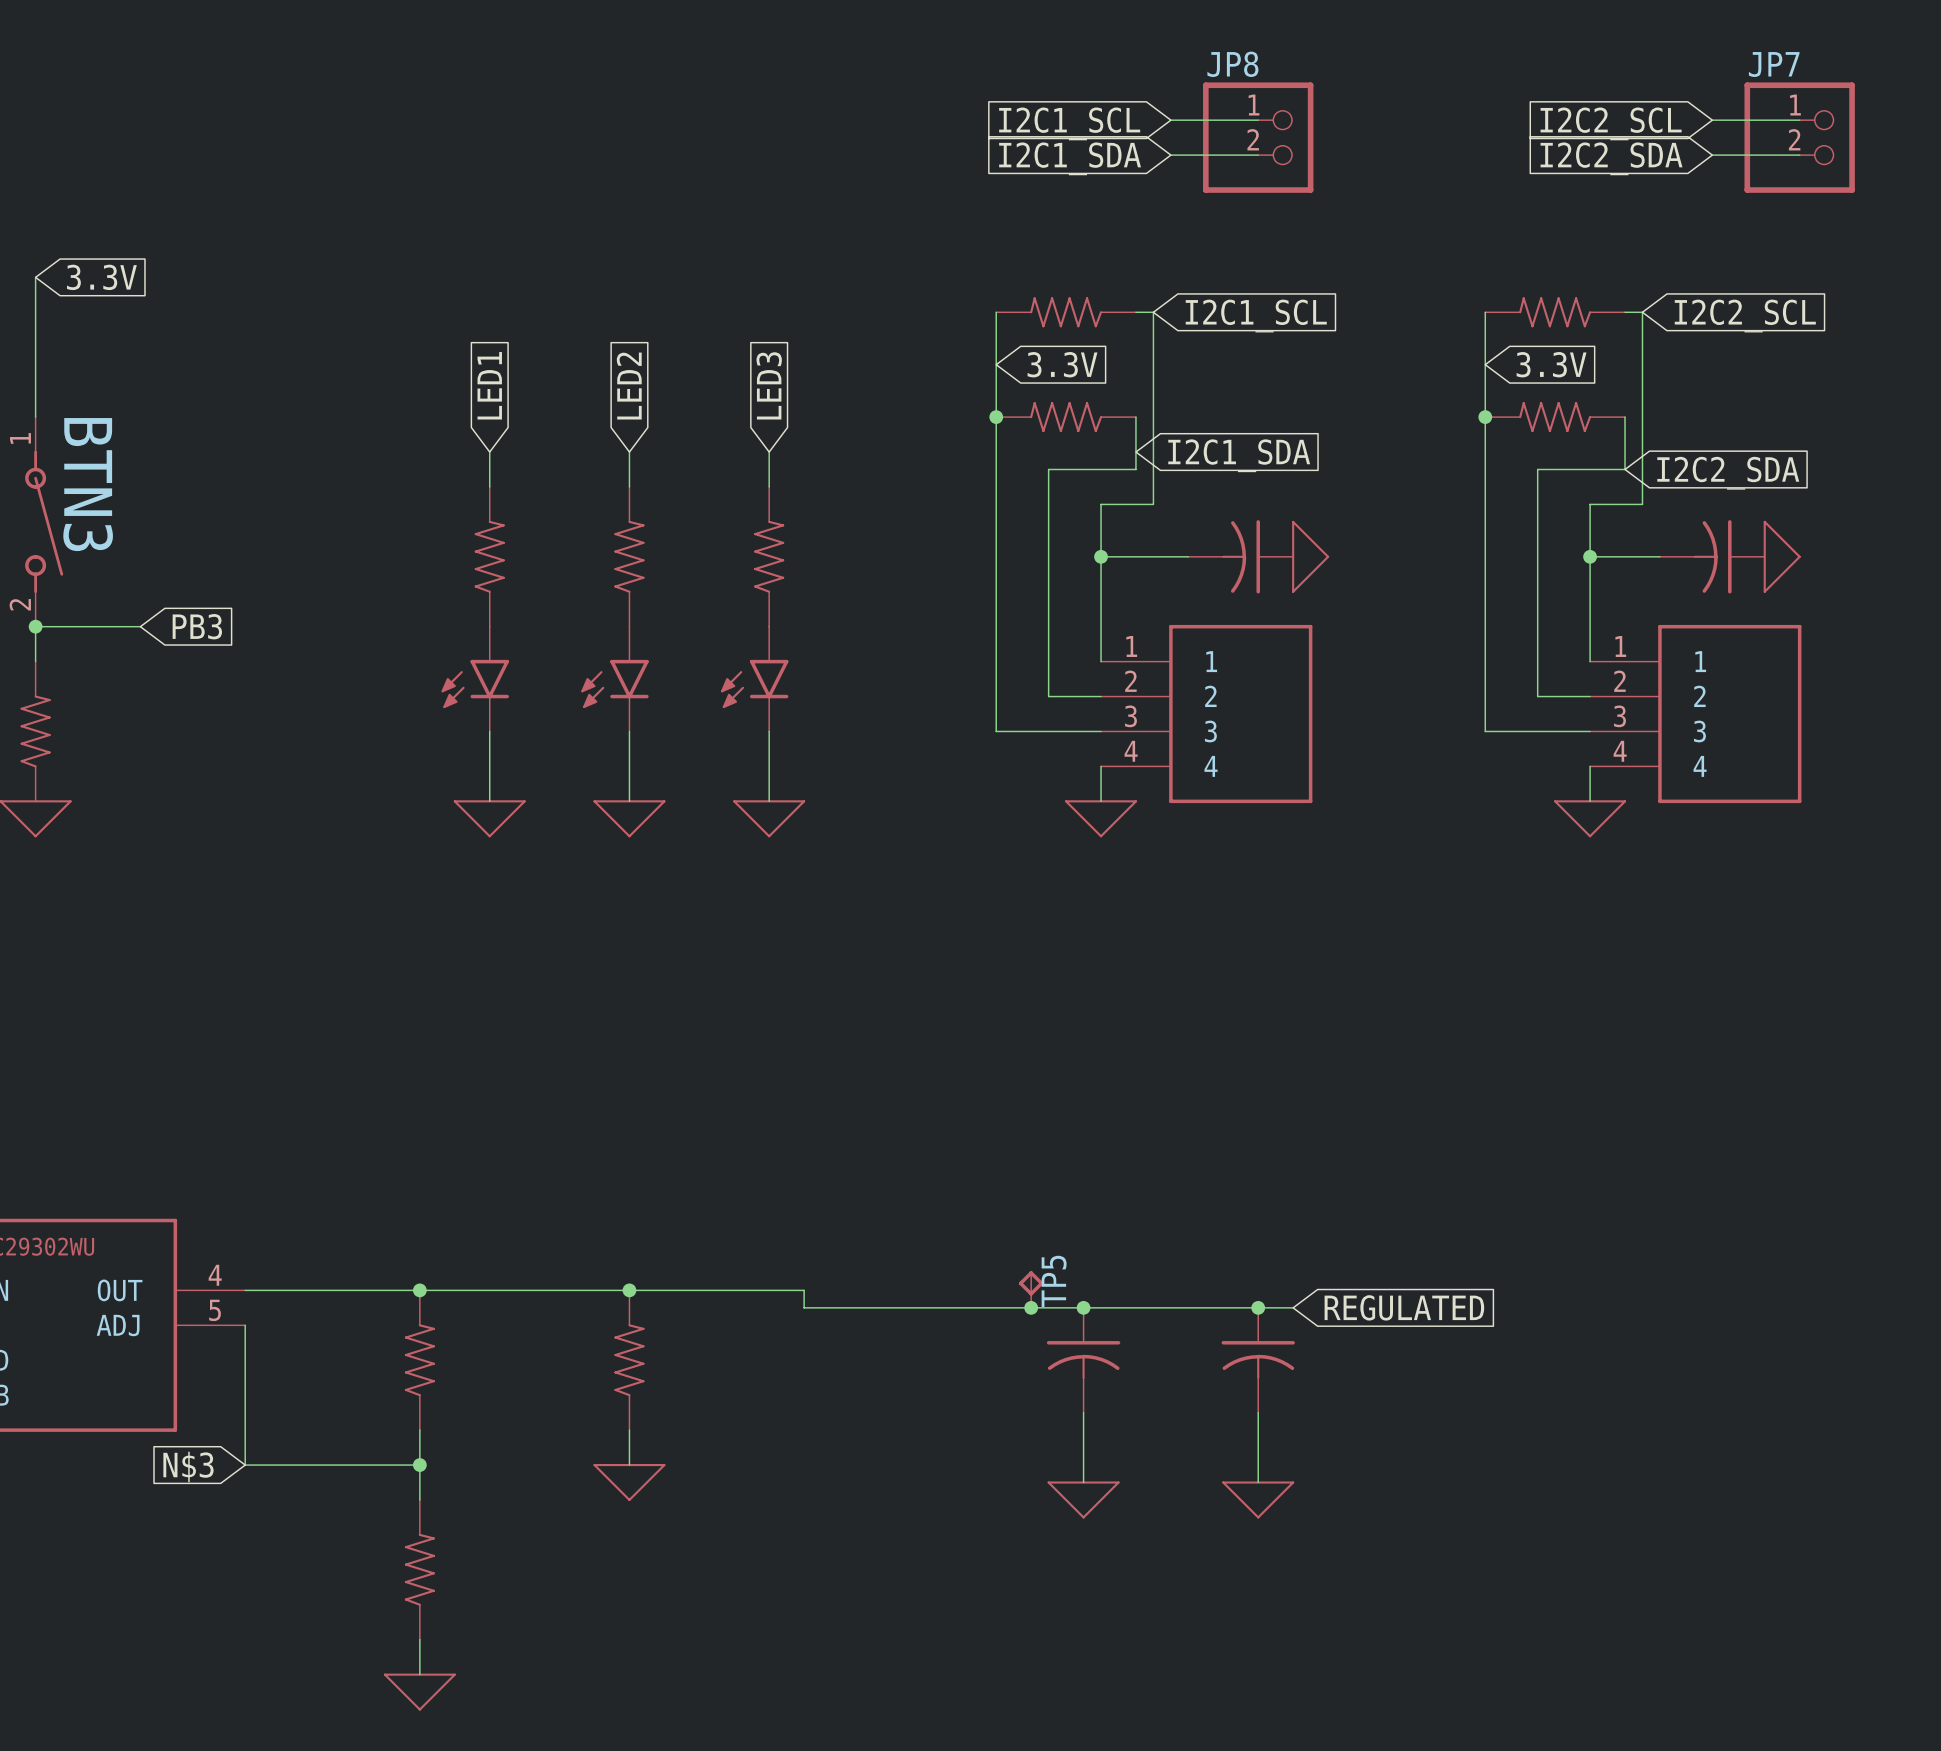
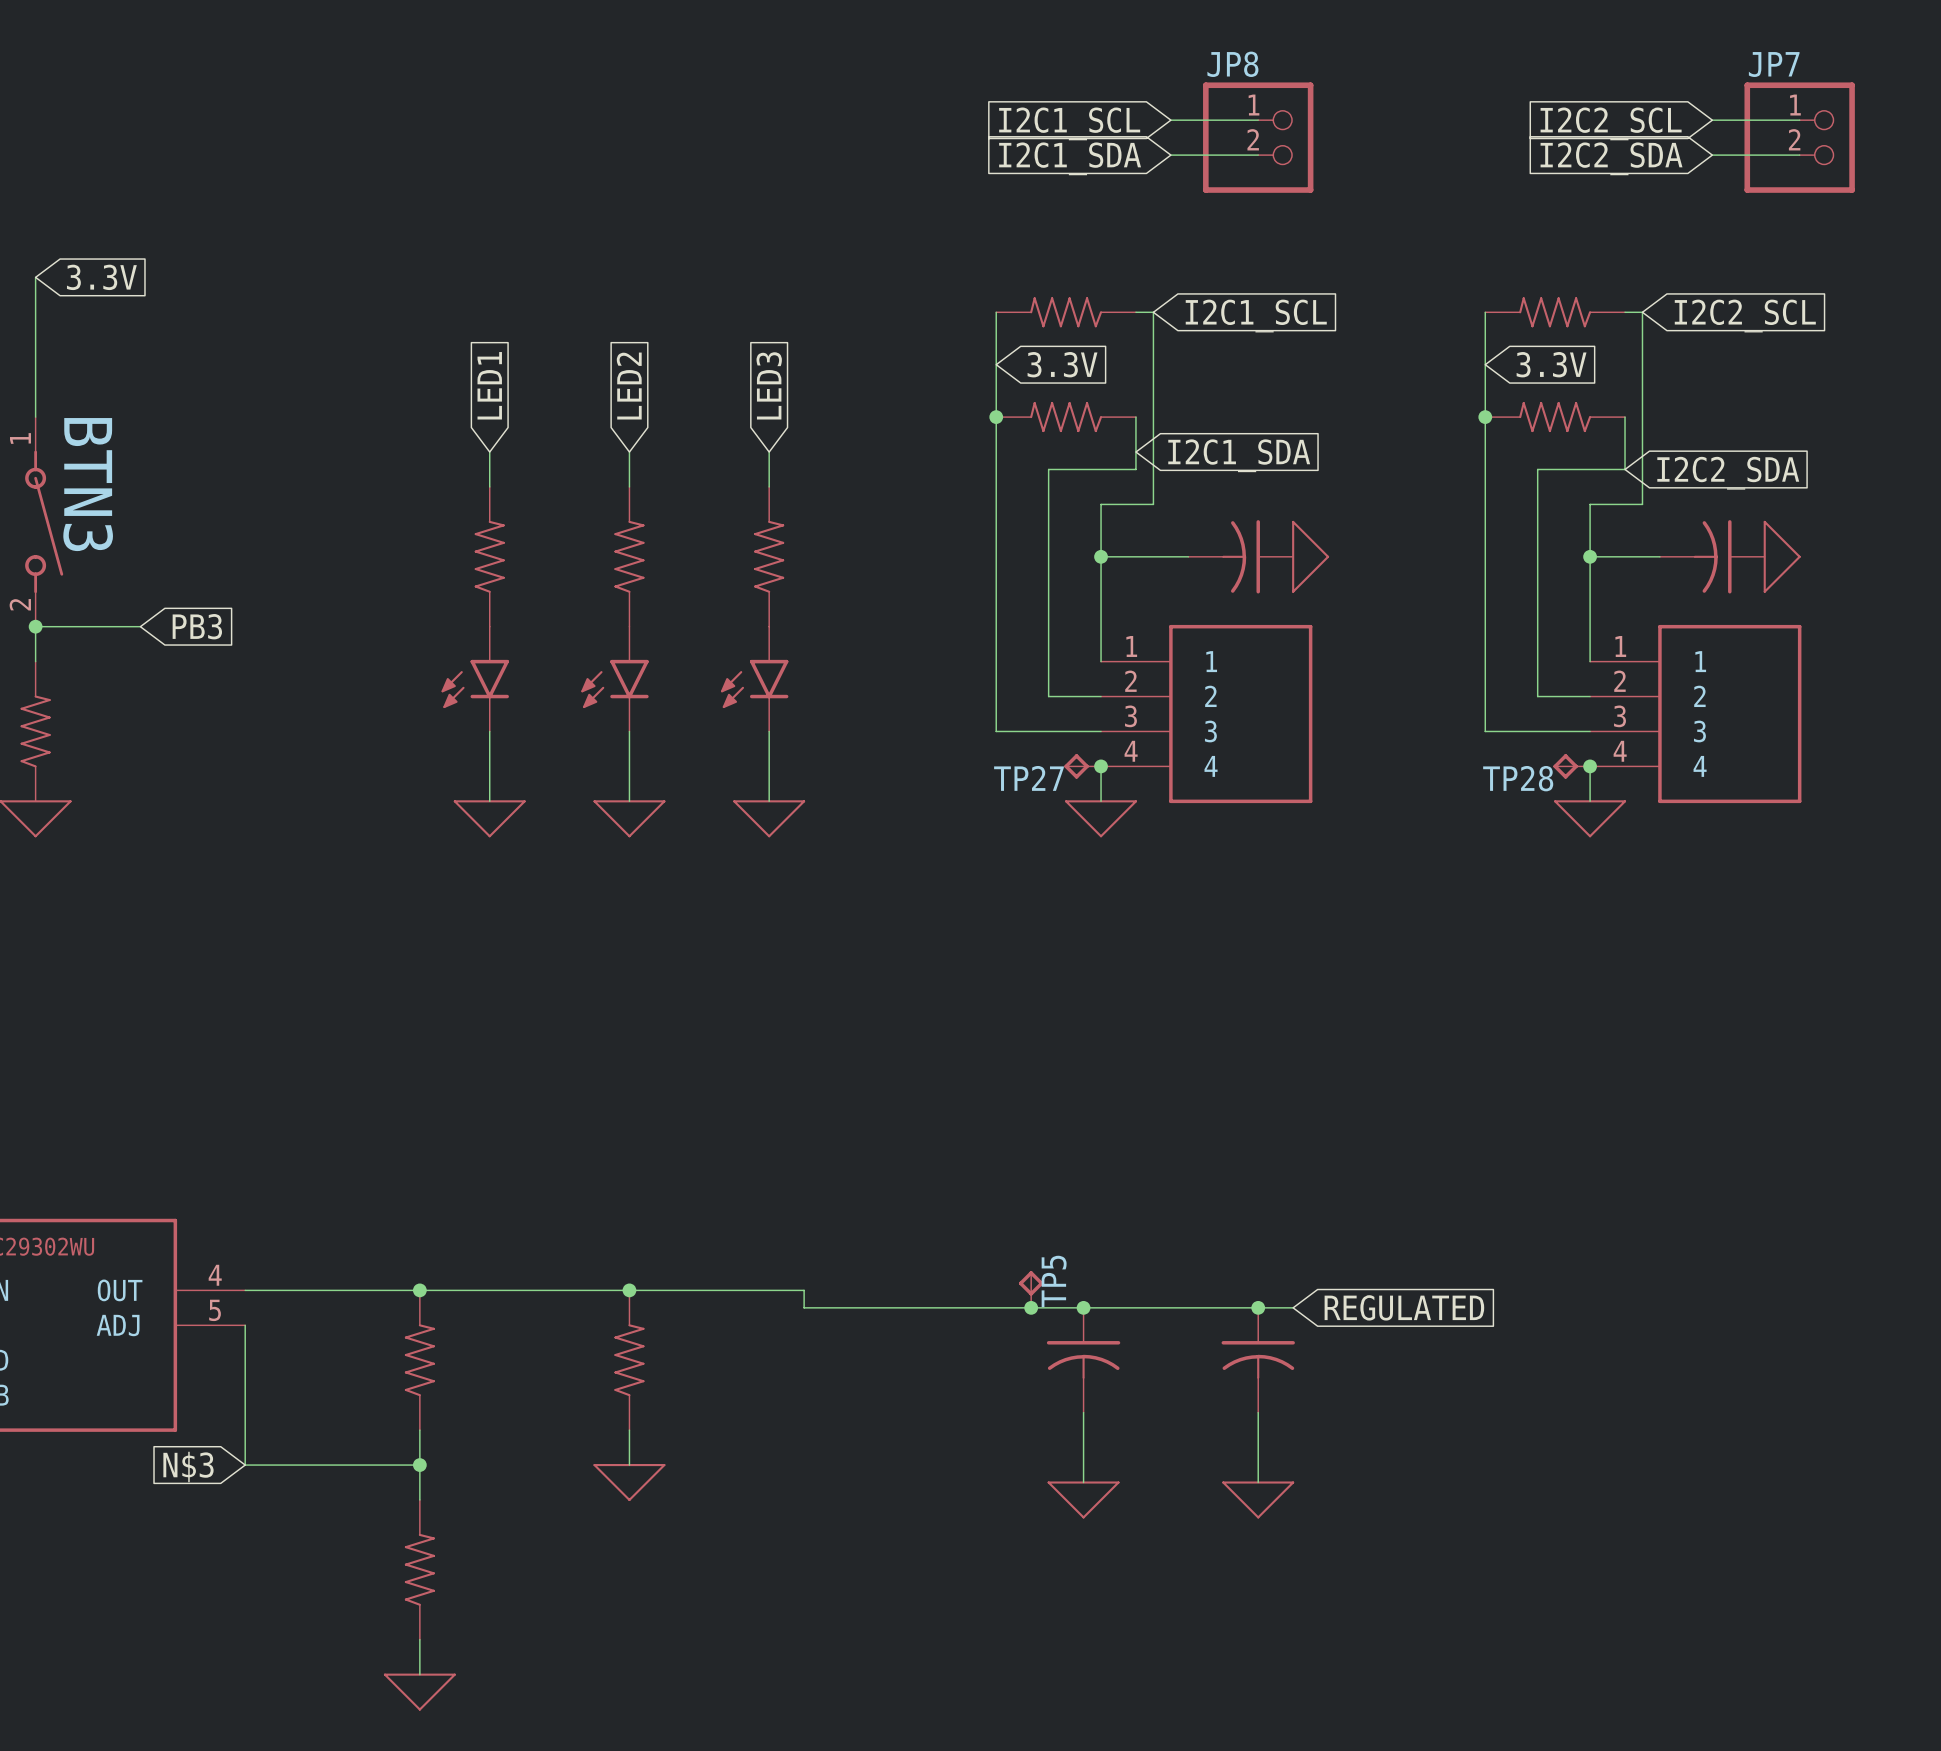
TP27: none -> (1082, 766)
junction: none -> (1101, 766)
TP28: none -> (1571, 766)
junction: none -> (1590, 766)

